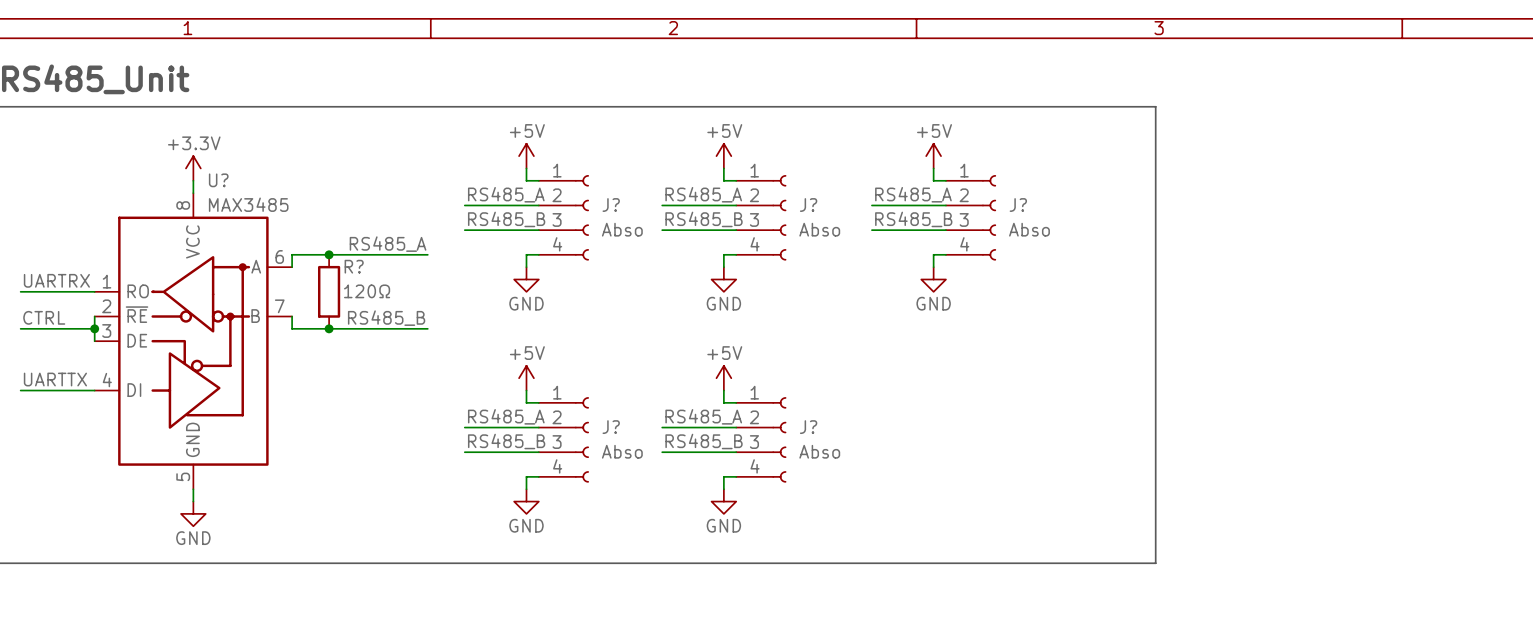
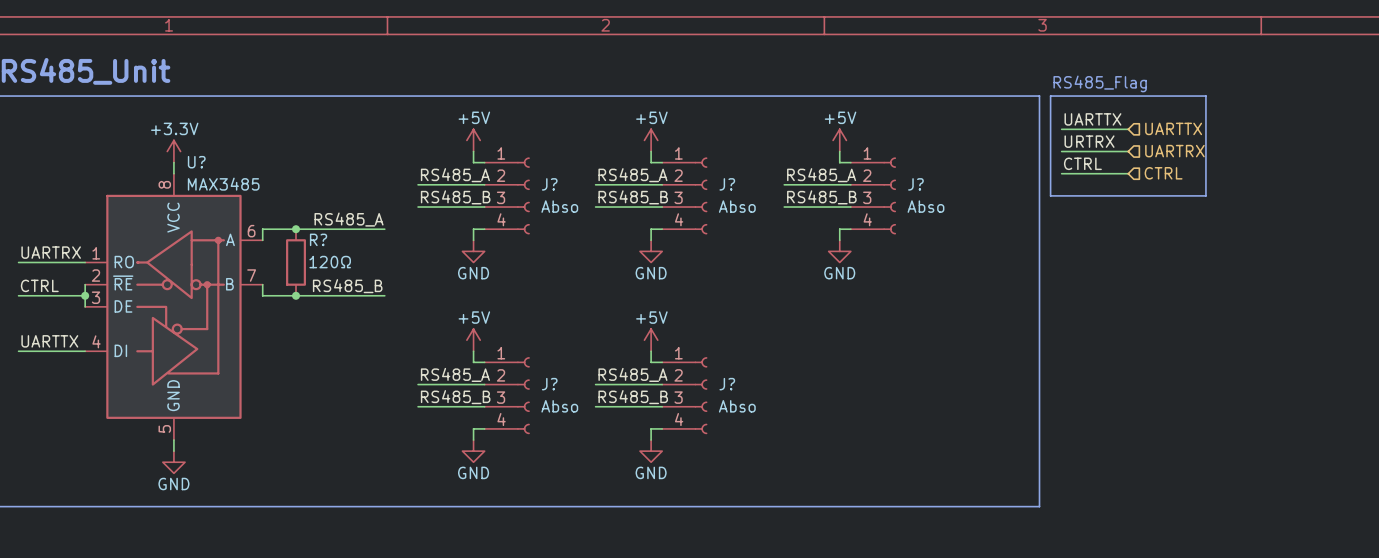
text: none -> RS485_Flag (1100, 83)
line: none -> (1050, 96) (1205, 96) (1205, 195) (1050, 195) (1050, 96)
label: none -> UARTTX (1092, 119)
wire: none -> (1061, 129) (1128, 129)
hierarchical label: none -> UARTTX (1173, 128)
label: none -> URTRX (1089, 141)
wire: none -> (1061, 151) (1128, 151)
hierarchical label: none -> UARTRX (1174, 151)
label: none -> CTRL (1082, 163)
hierarchical label: none -> CTRL (1163, 173)
wire: none -> (1061, 173) (1128, 173)

